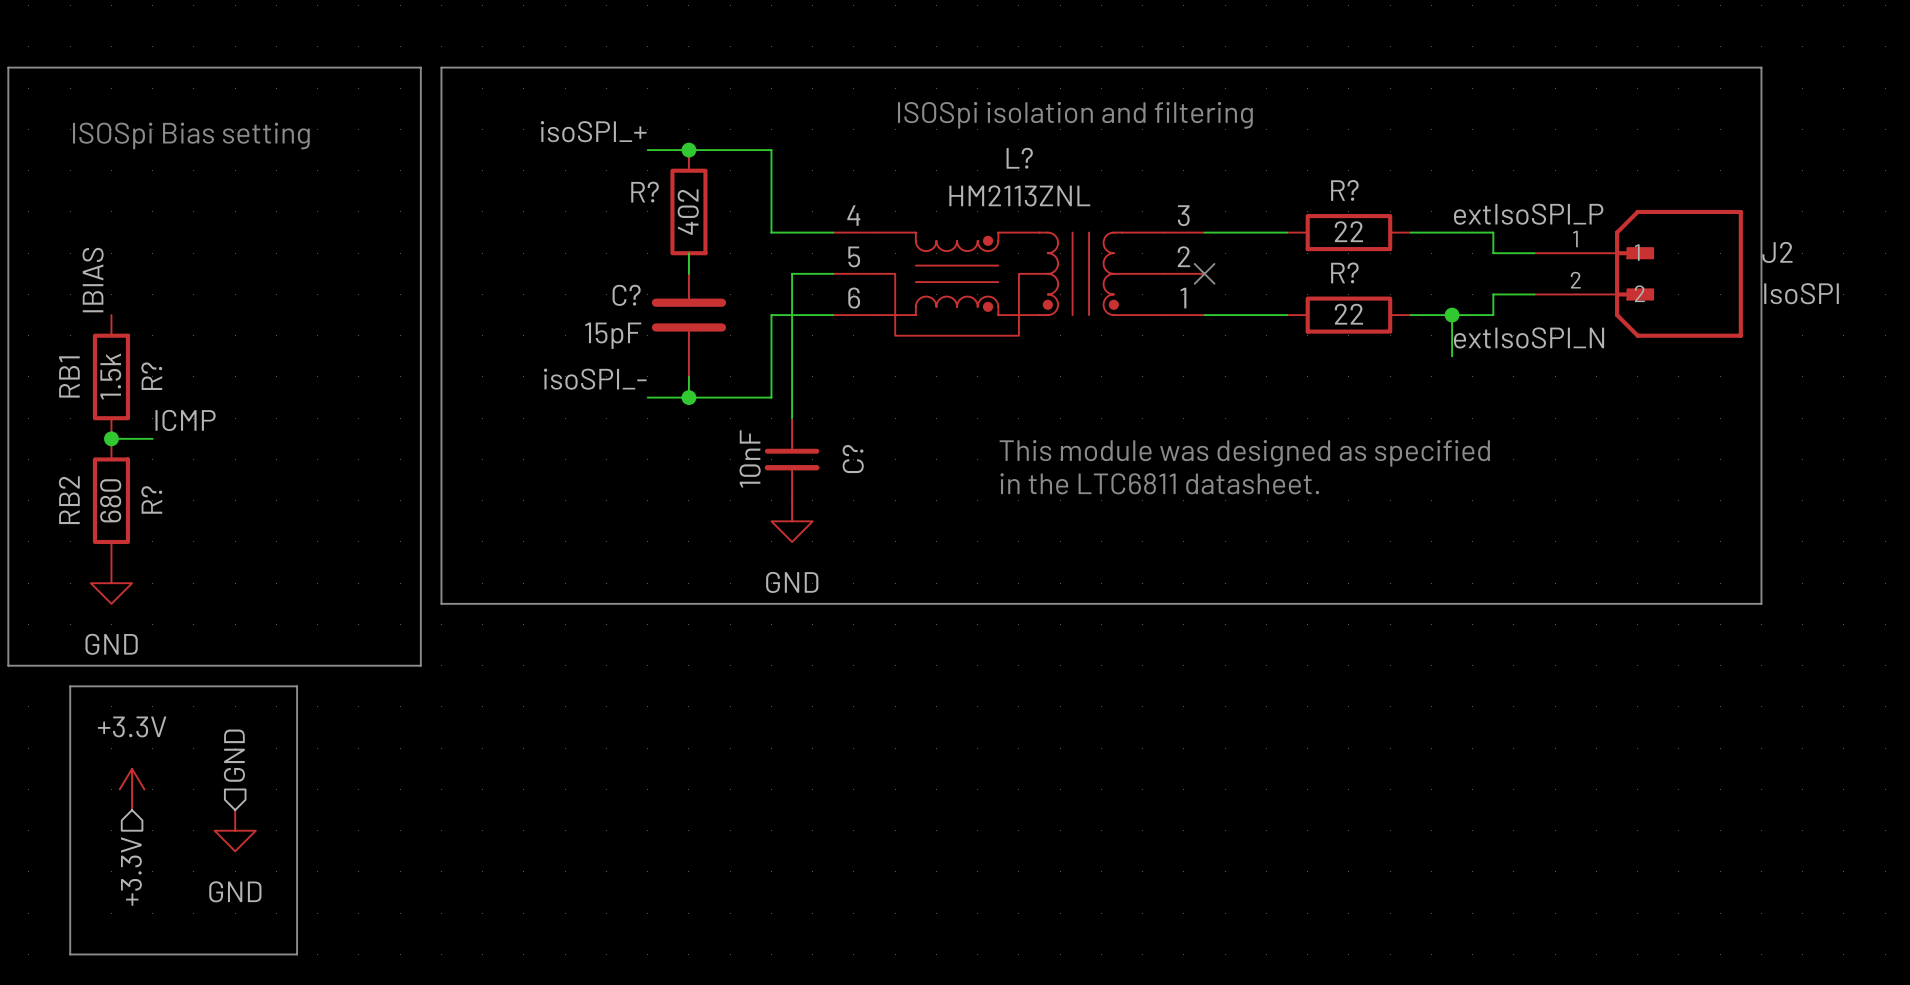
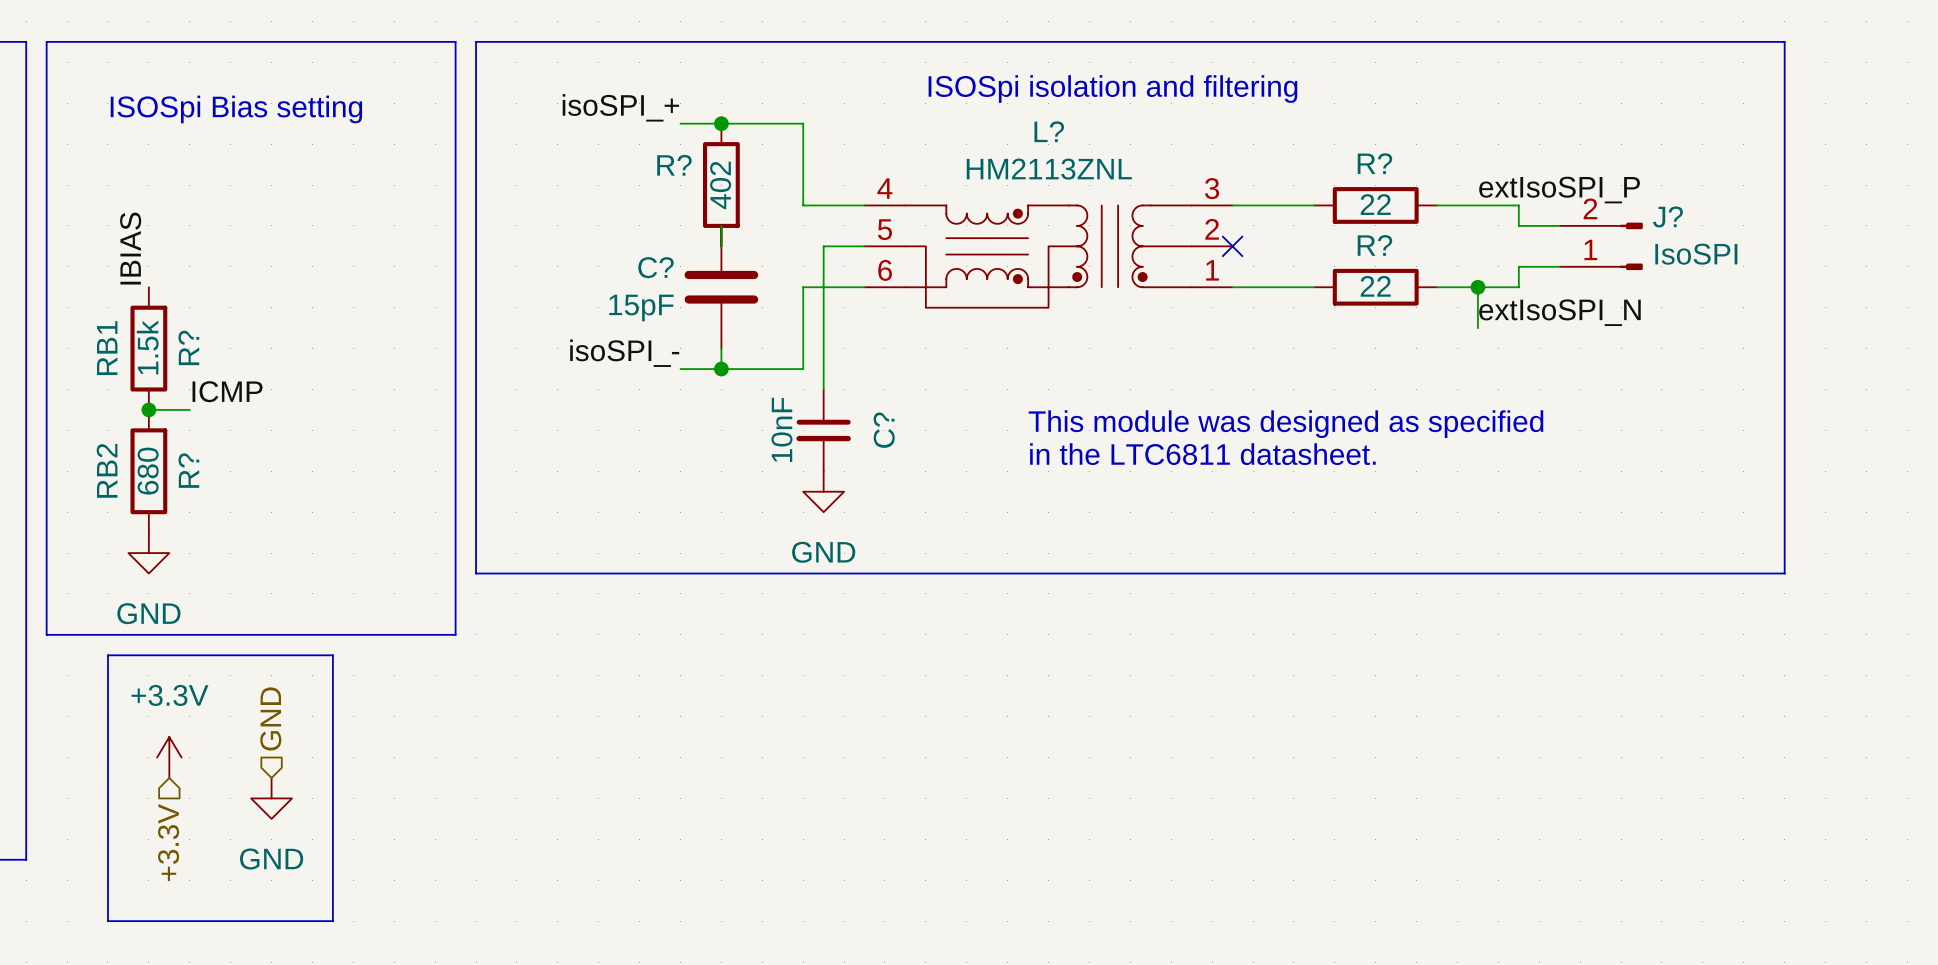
J?: none -> IsoSPI (1601, 246)
J2: IsoSPI (1638, 273) -> none

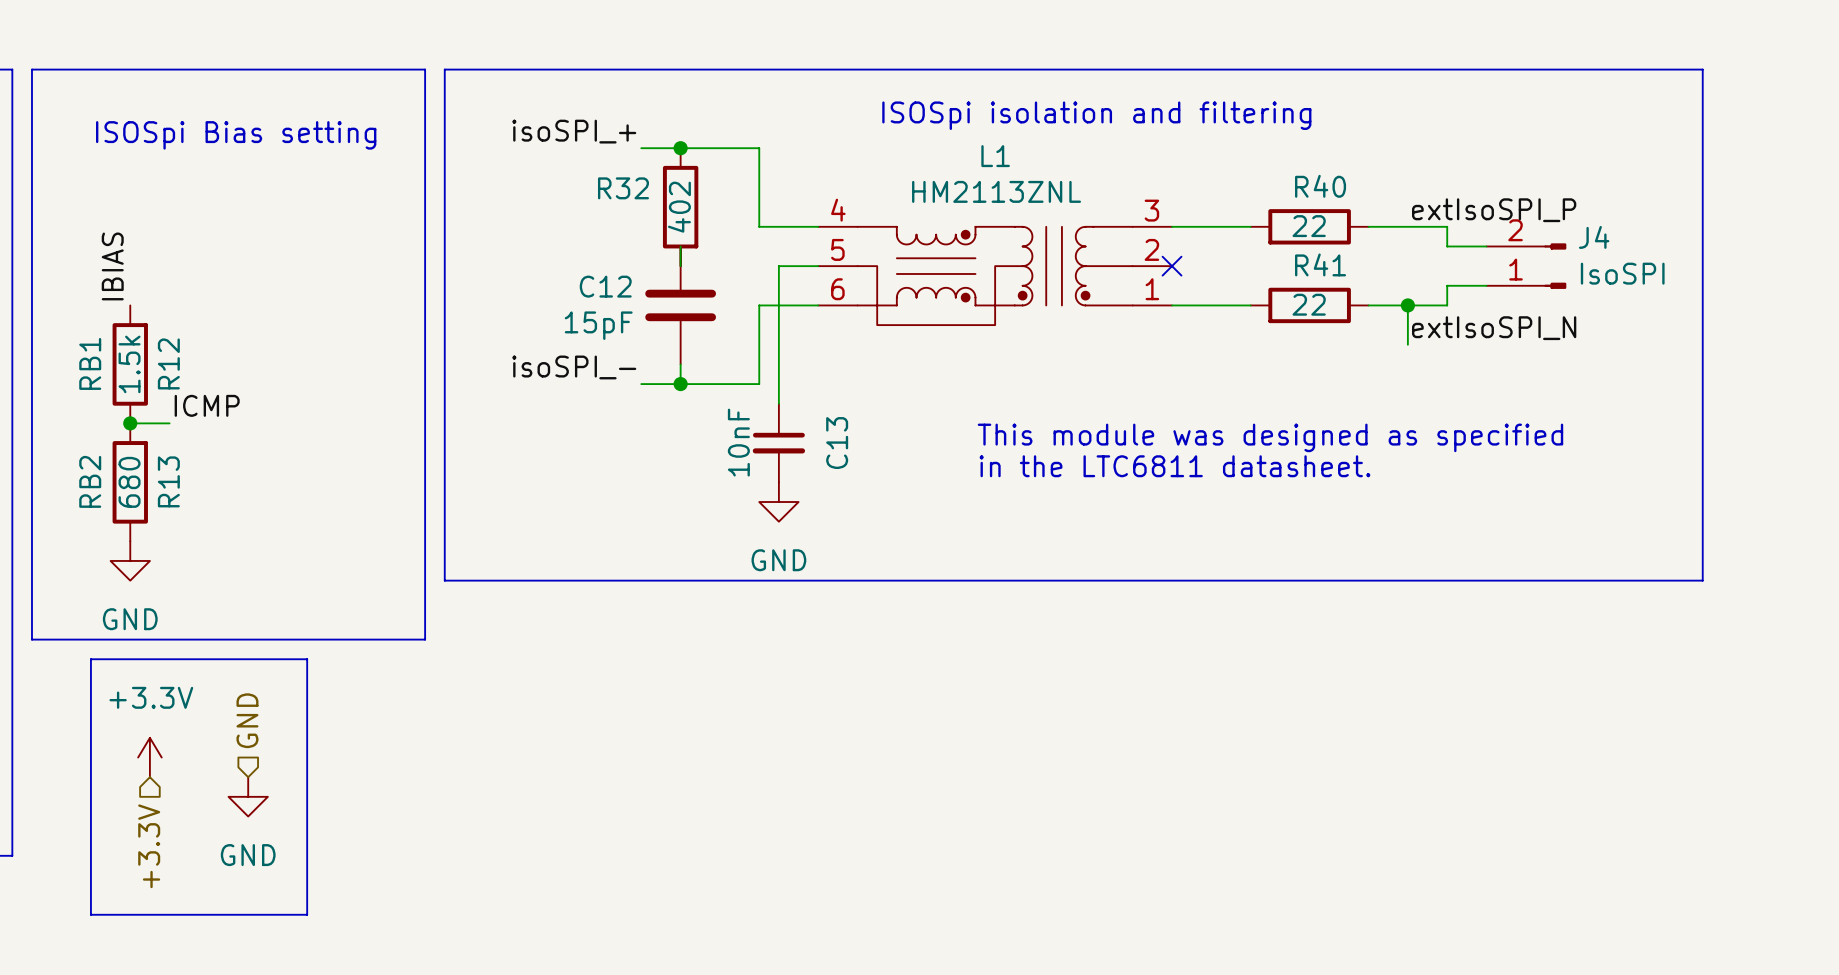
L? name: L? (1049, 131) -> L1 (995, 156)
R? name: R? (1374, 163) -> R40 (1320, 186)
R? name: R? (674, 165) -> R32 (623, 188)
J? name: J? (1667, 216) -> J4 (1594, 237)
R? name: R? (1374, 245) -> R41 (1320, 264)
C? name: C? (655, 267) -> C12 (605, 286)
R? name: R? (188, 347) -> R12 (168, 363)
C? name: C? (884, 430) -> C13 (837, 443)
R? name: R? (188, 470) -> R13 (168, 481)

